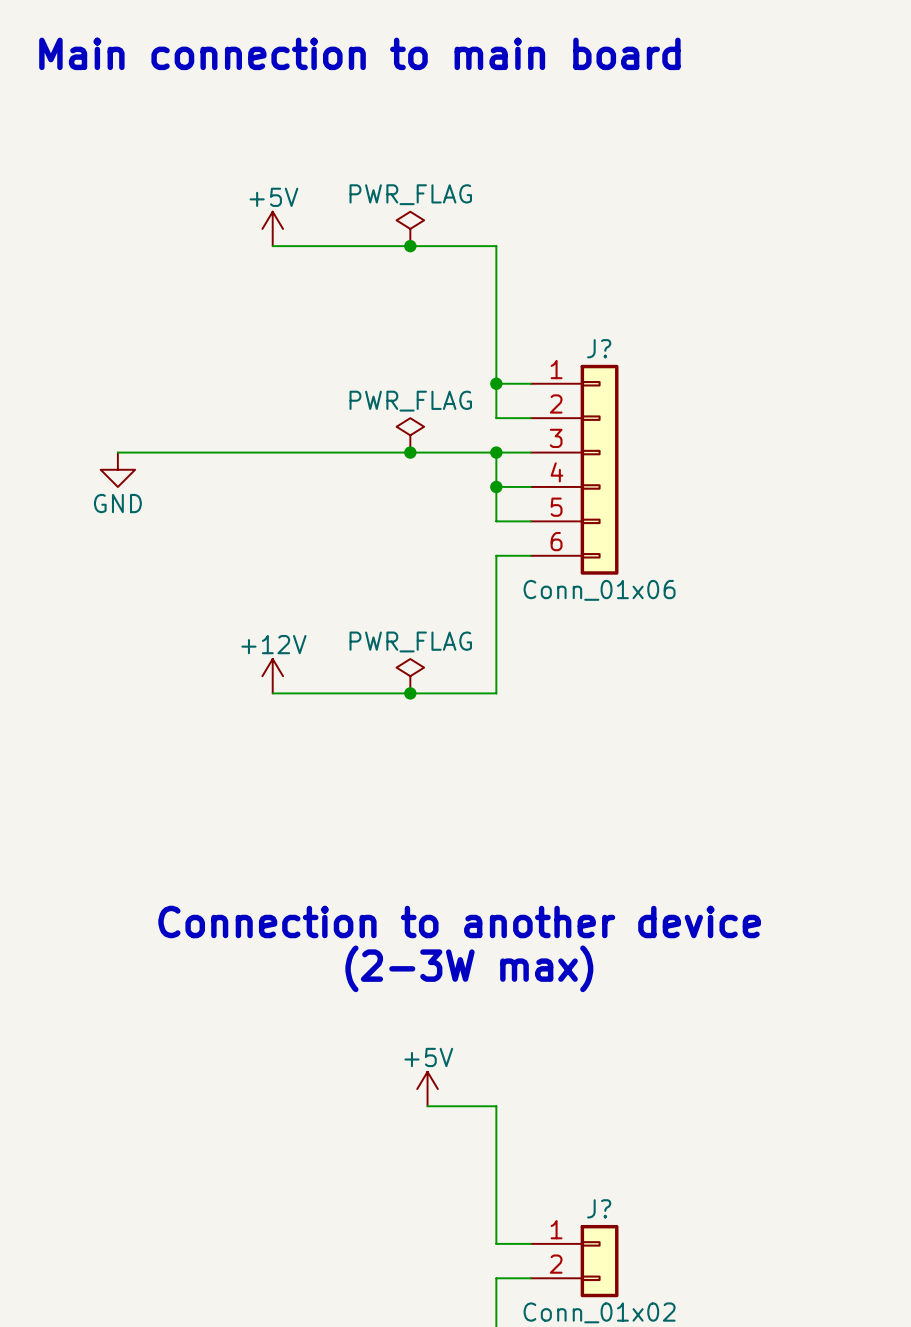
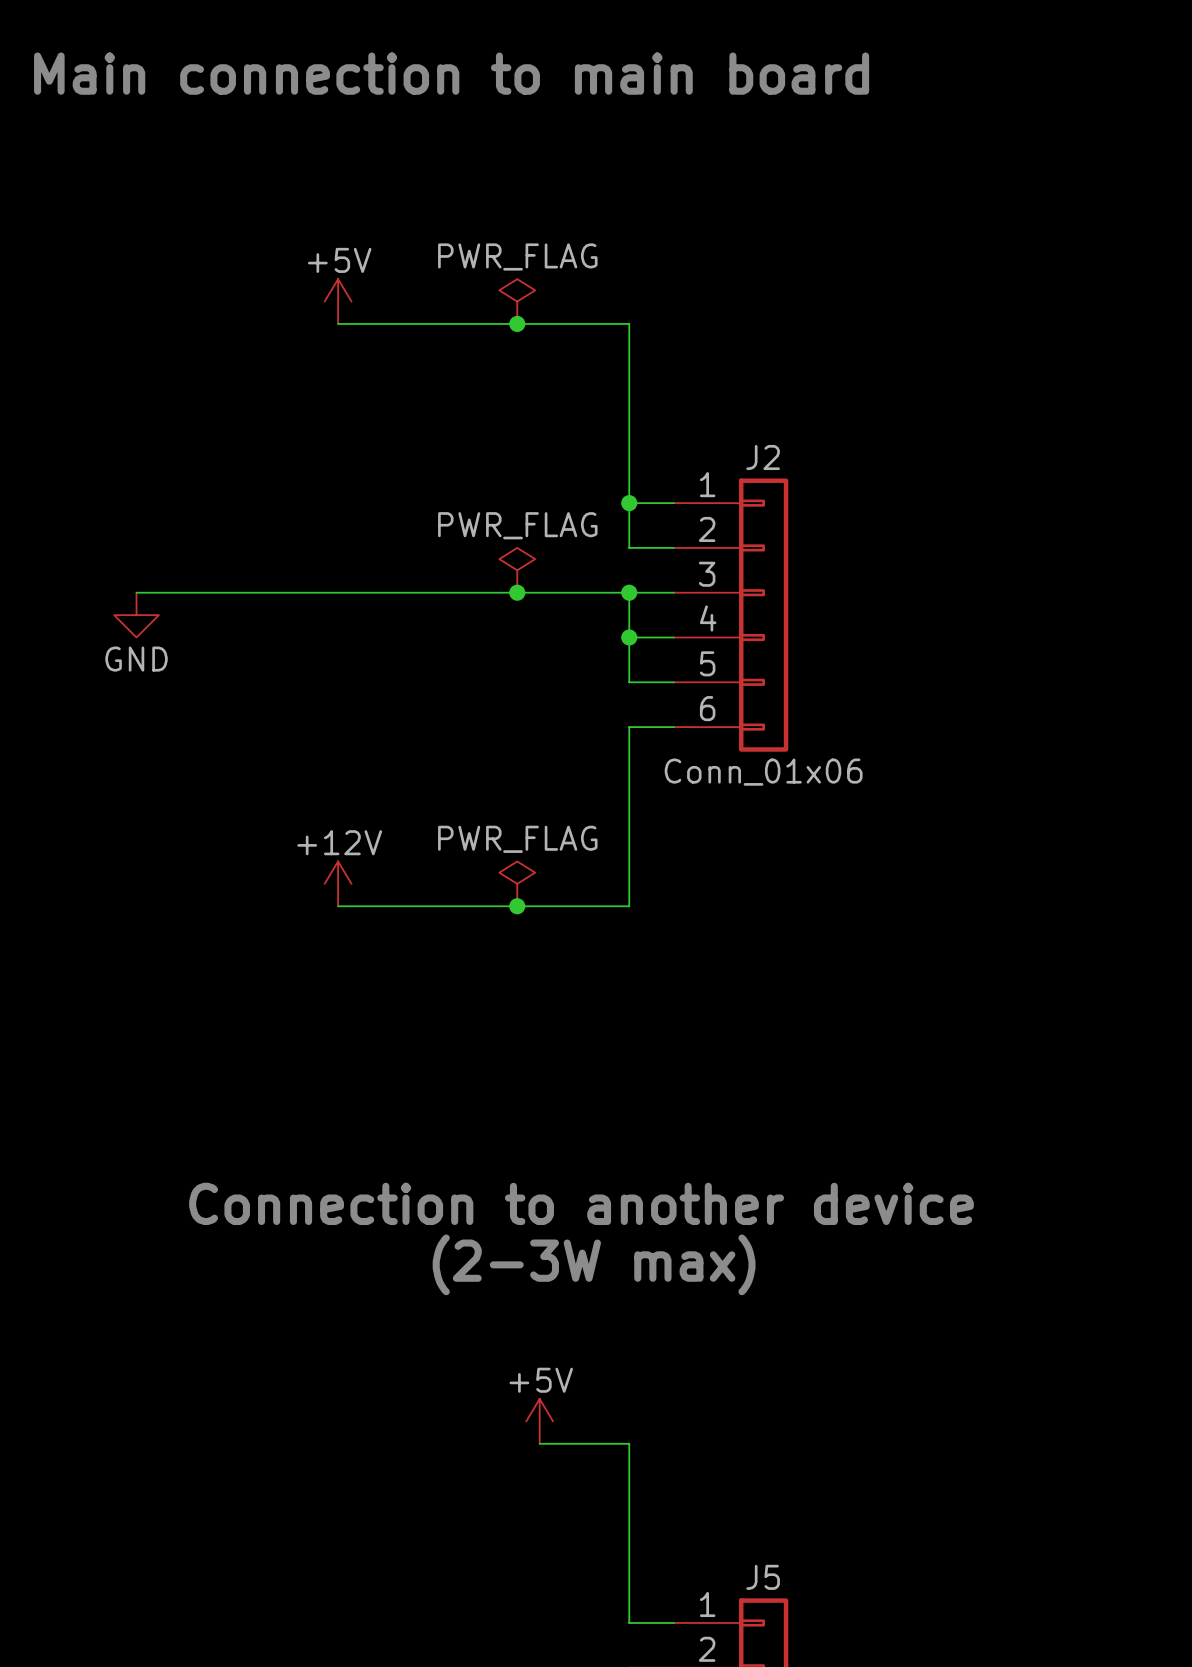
J? name: J? (599, 348) -> J2 (763, 457)
J? name: J? (599, 1208) -> J5 (763, 1577)

